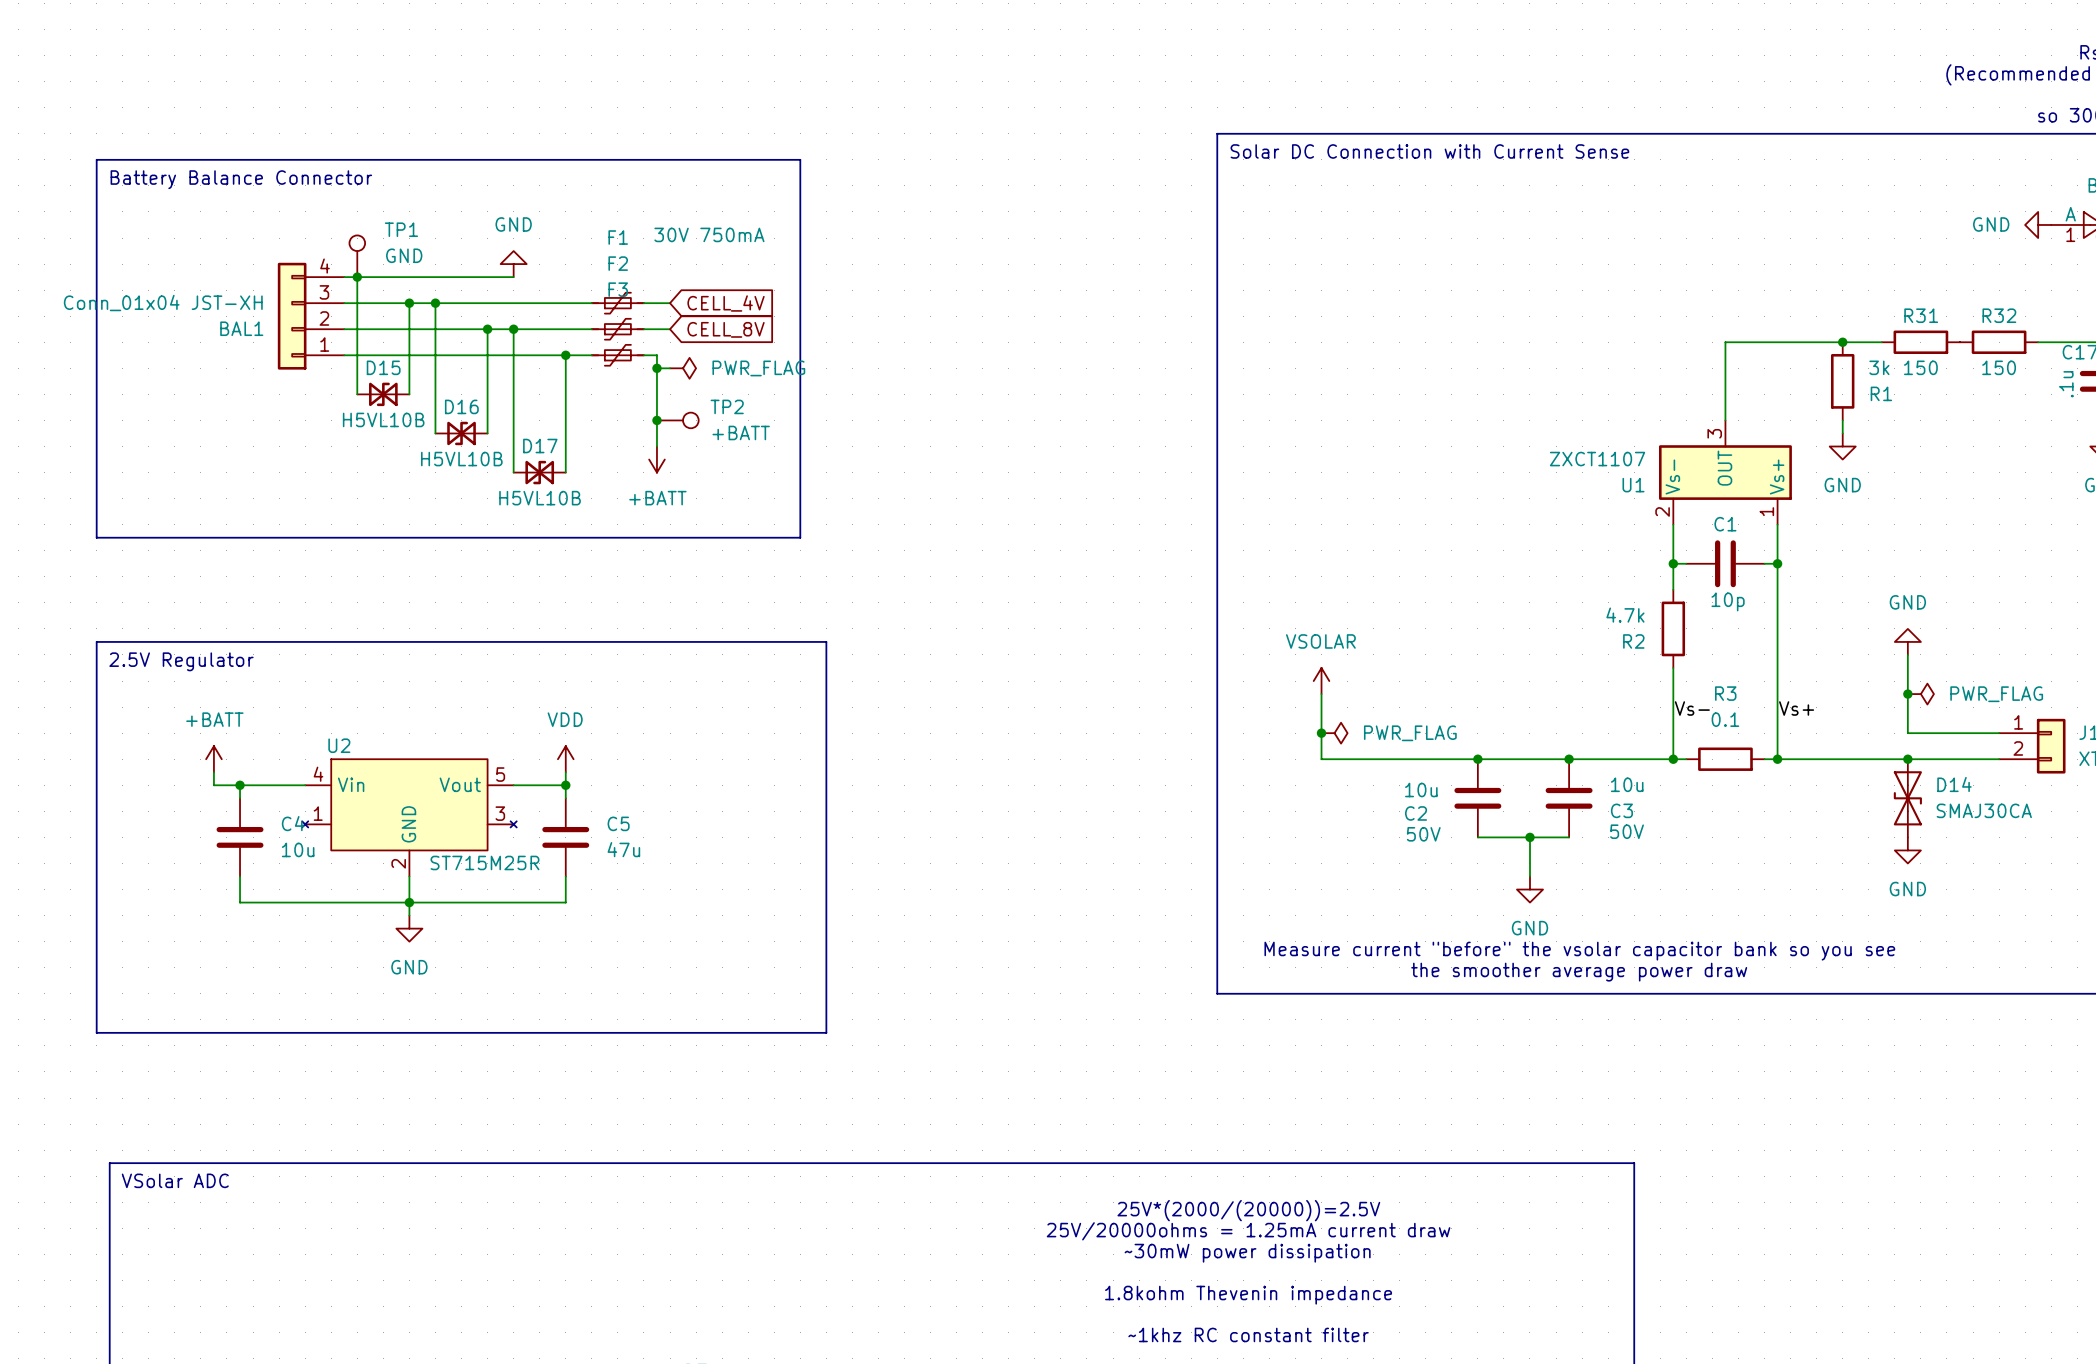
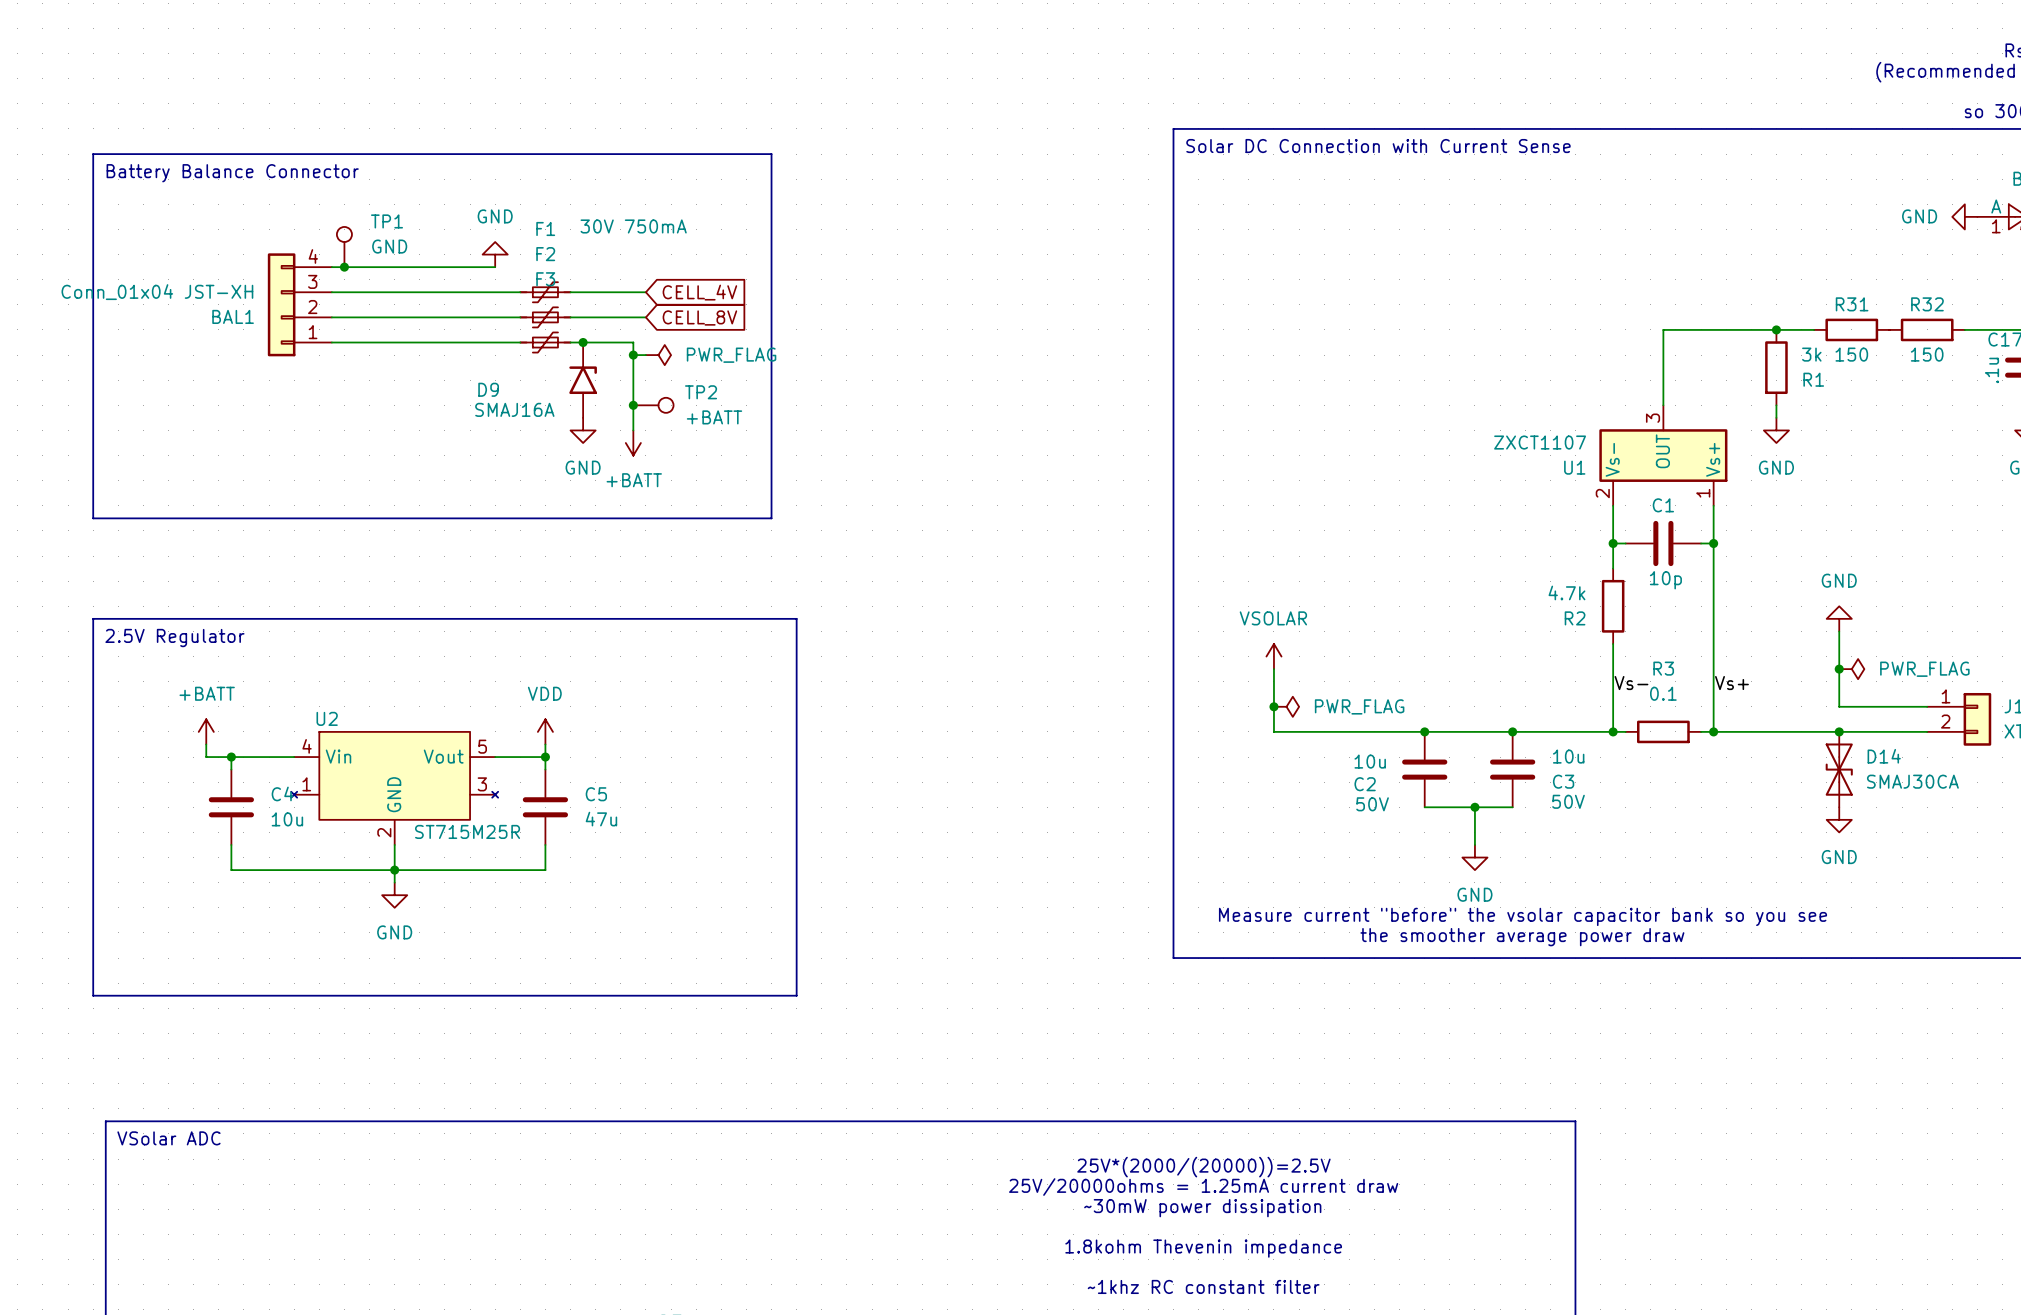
wire: (357, 277) (357, 394) -> none
wire: (409, 303) (409, 394) -> none
junction: (409, 303) -> none
wire: (435, 303) (435, 433) -> none
junction: (435, 303) -> none
F1 position: (617, 303) -> (545, 292)
wire: (487, 329) (487, 433) -> none
junction: (487, 329) -> none
wire: (513, 329) (513, 472) -> none
junction: (513, 329) -> none
F2 position: (617, 329) -> (545, 317)
wire: (565, 355) (565, 472) -> none
junction position: (565, 355) -> (583, 342)
F3 position: (617, 355) -> (545, 342)
D15: H5VL10B (383, 394) -> none
D9: none -> SMAJ16A (583, 380)
D16: H5VL10B (461, 433) -> none
power symbol: none -> GND (583, 430)
D17: H5VL10B (539, 472) -> none

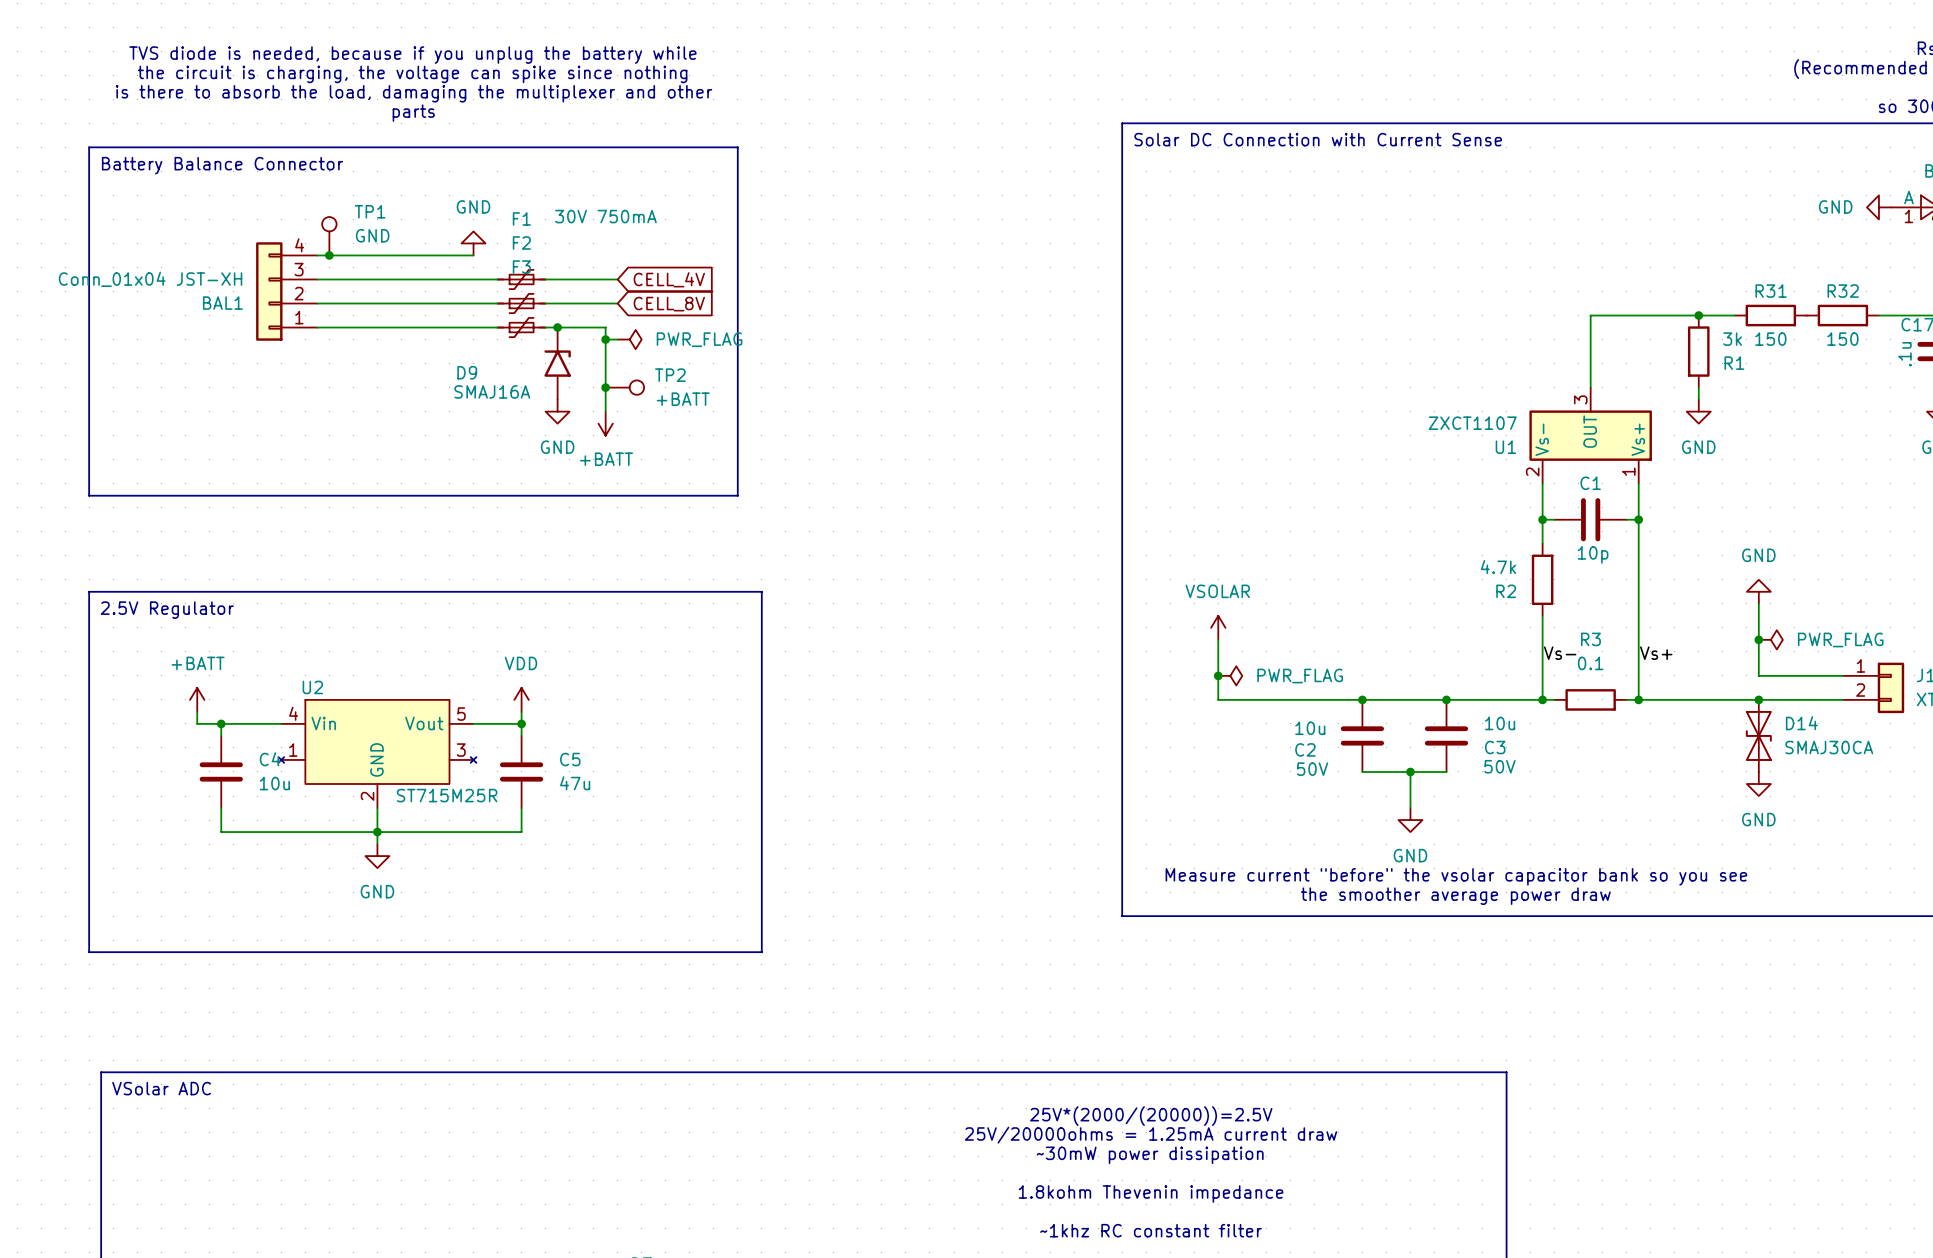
text: none -> TVS diode is needed, because if you unplug the battery while (412, 55)
text: none -> the circuit is charging, the voltage can spike since nothing (412, 74)
text: none -> is there to absorb the load, damaging the multiplexer and other (414, 93)
text: none -> parts (413, 113)

